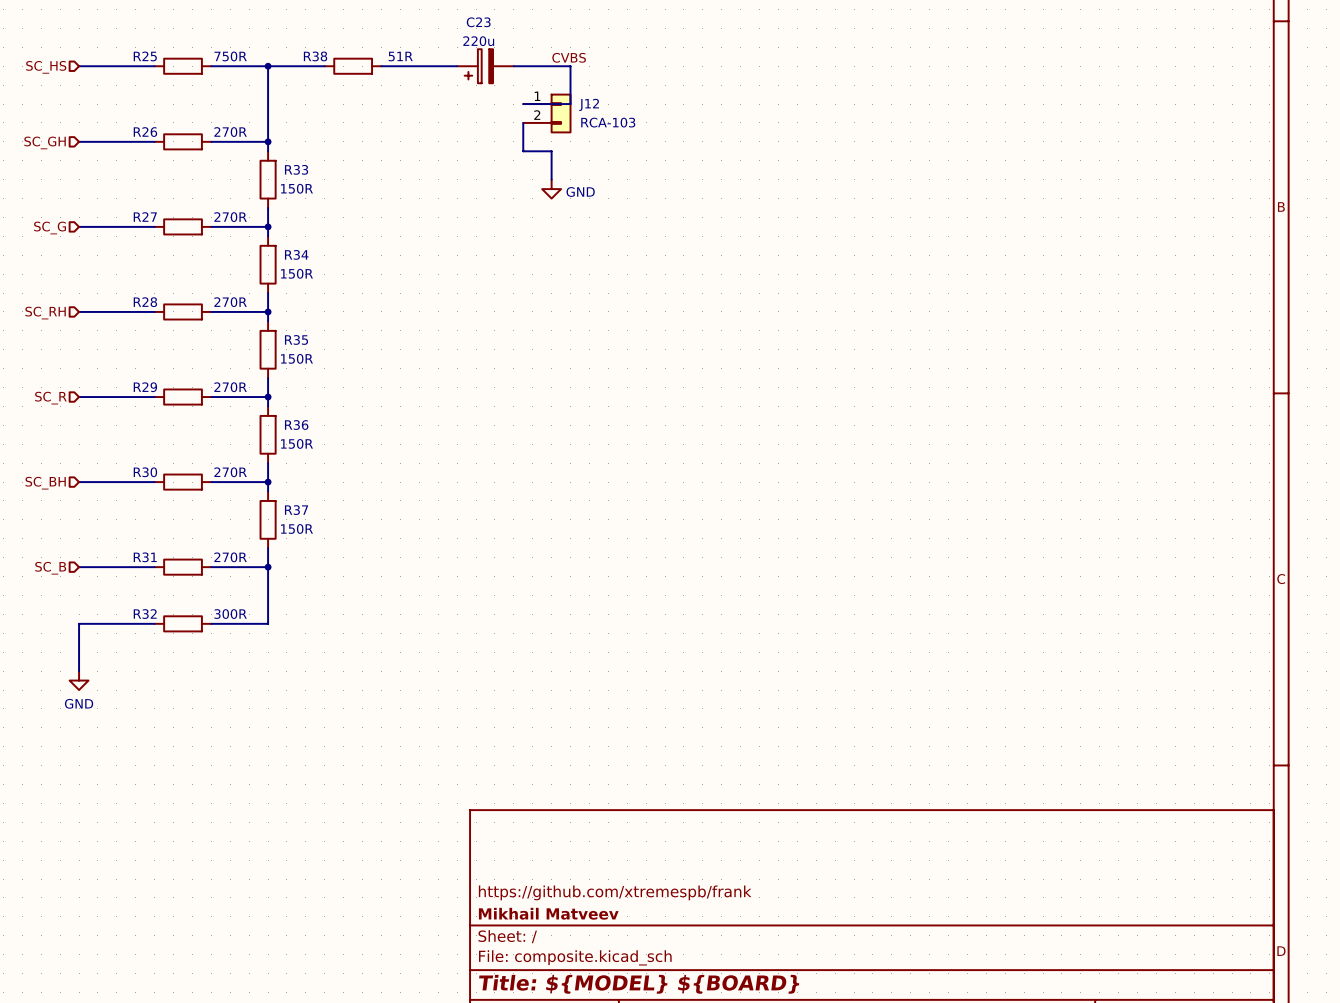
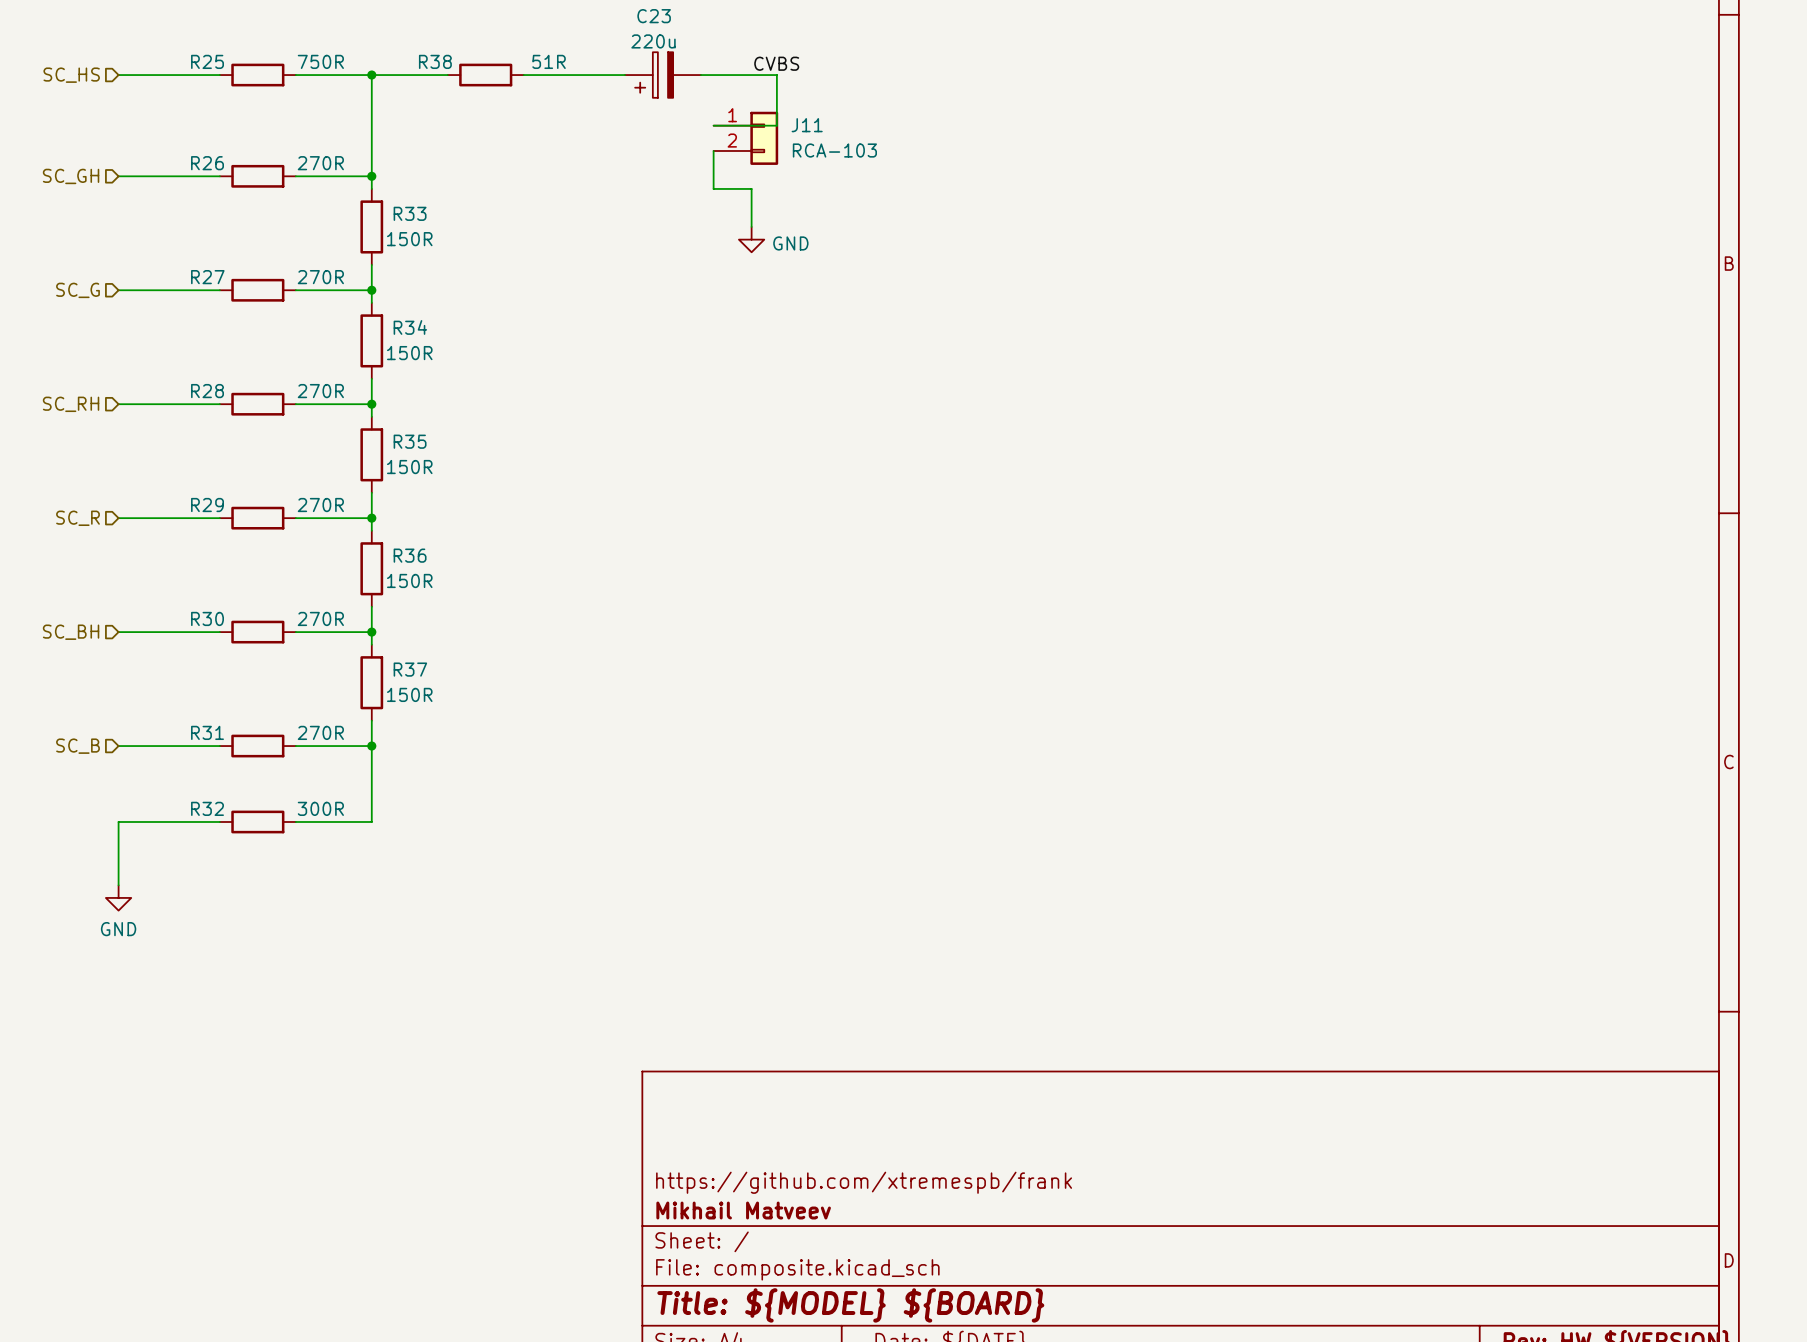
J12 name: J12 (589, 104) -> J11 (807, 125)

